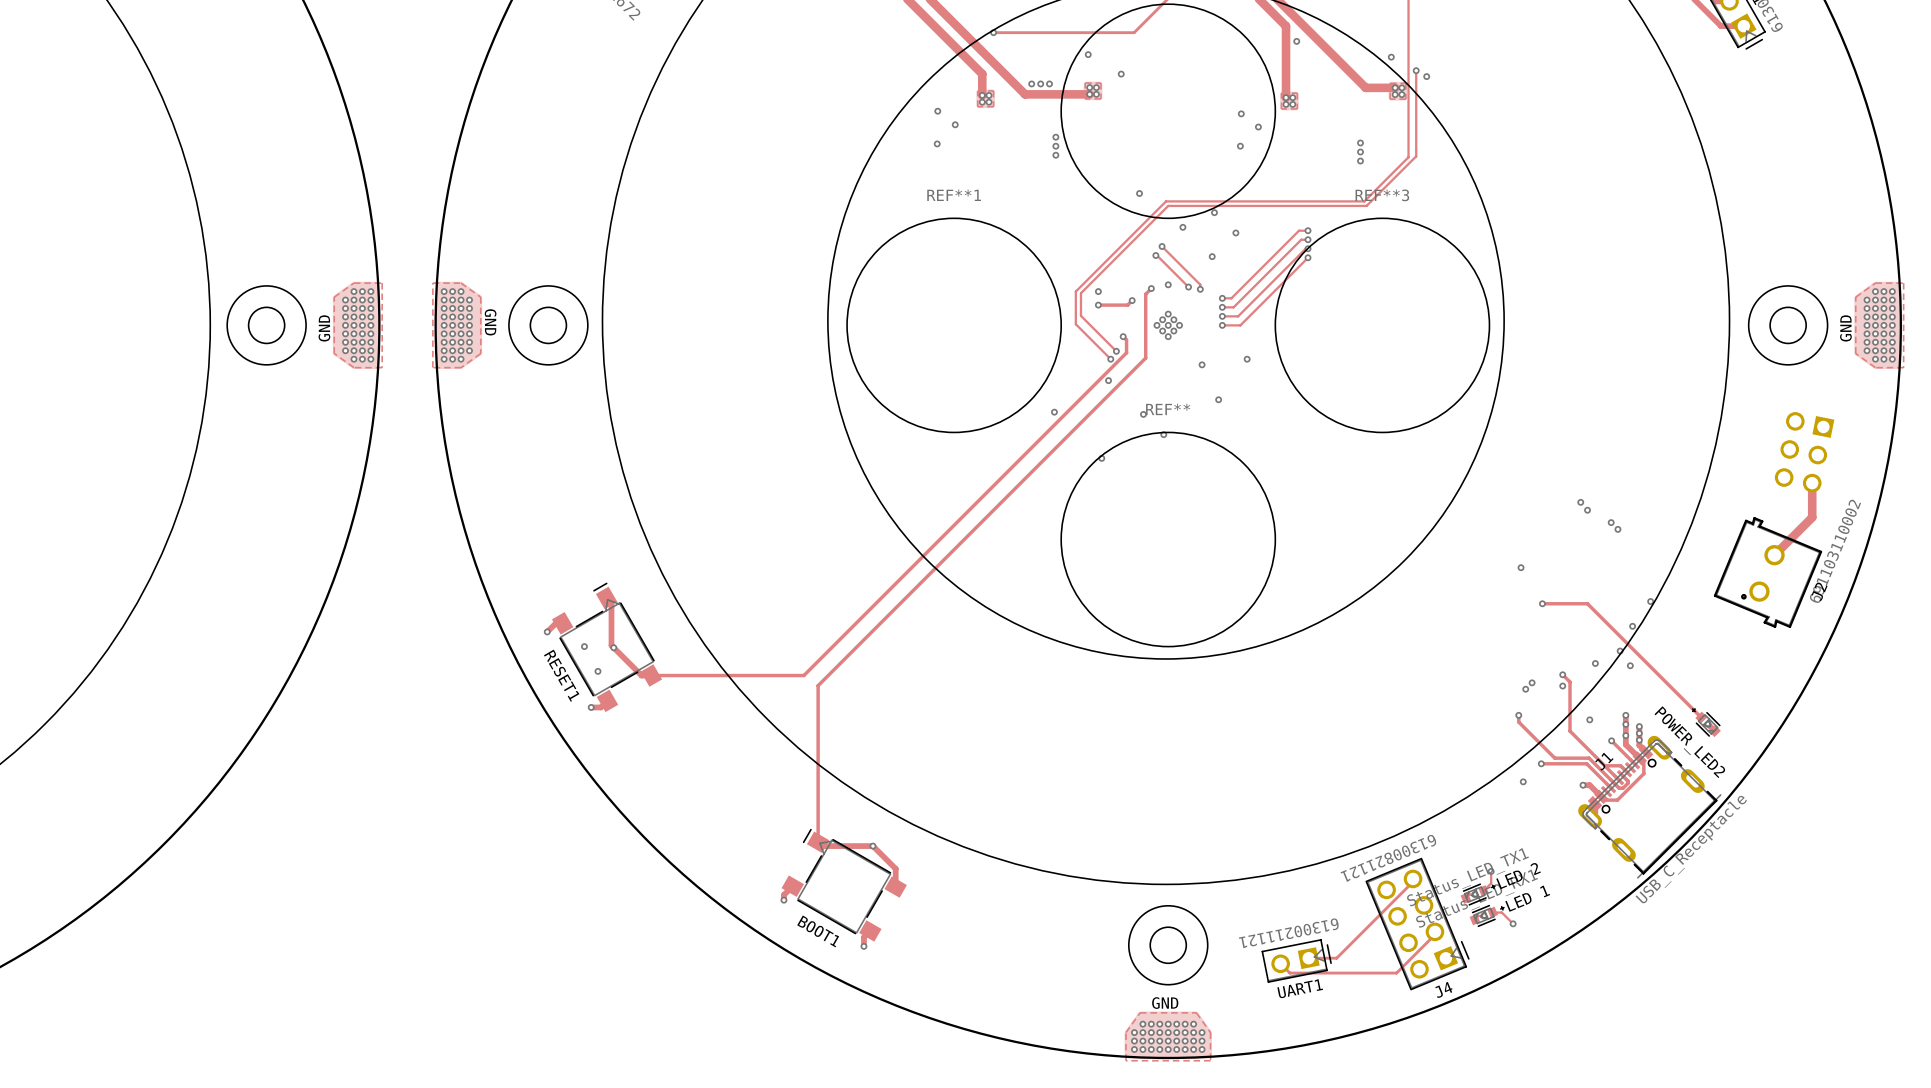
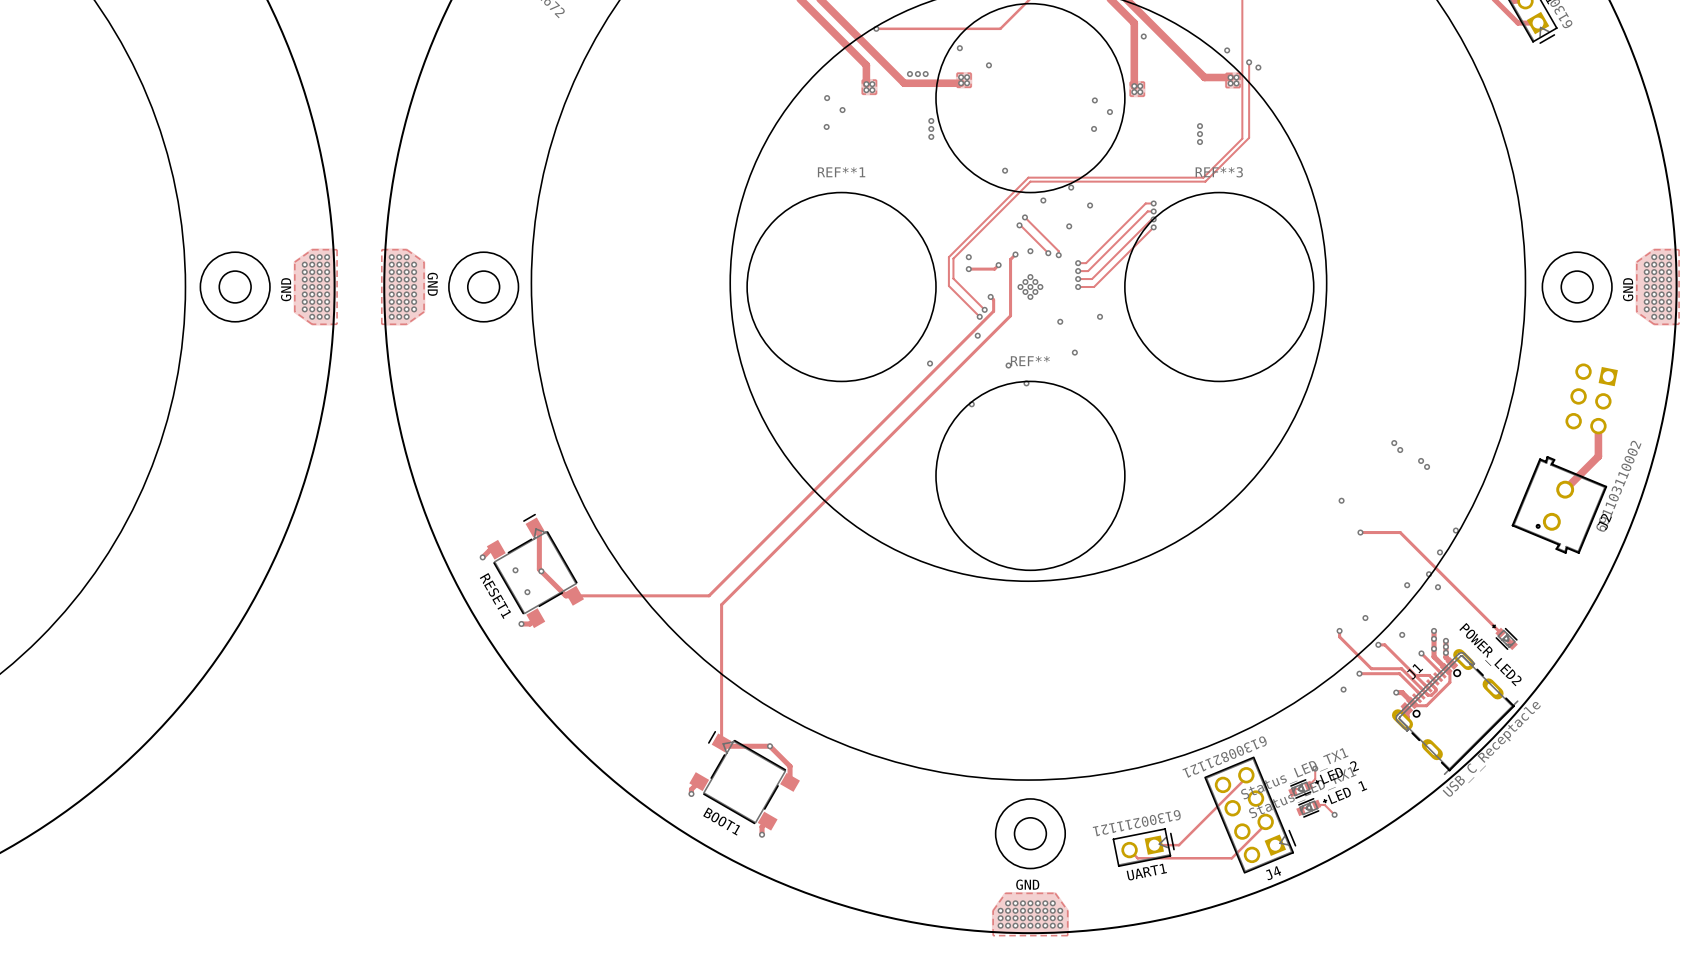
track: (1562, 674) (1570, 682) (1570, 731) -> (1378, 644) (1384, 644)
via: (1562, 674) -> none
via: (1532, 682) -> none
via: (1562, 686) -> none
via: (1525, 689) -> none
via: none -> (1365, 618)
via: none -> (1378, 644)

